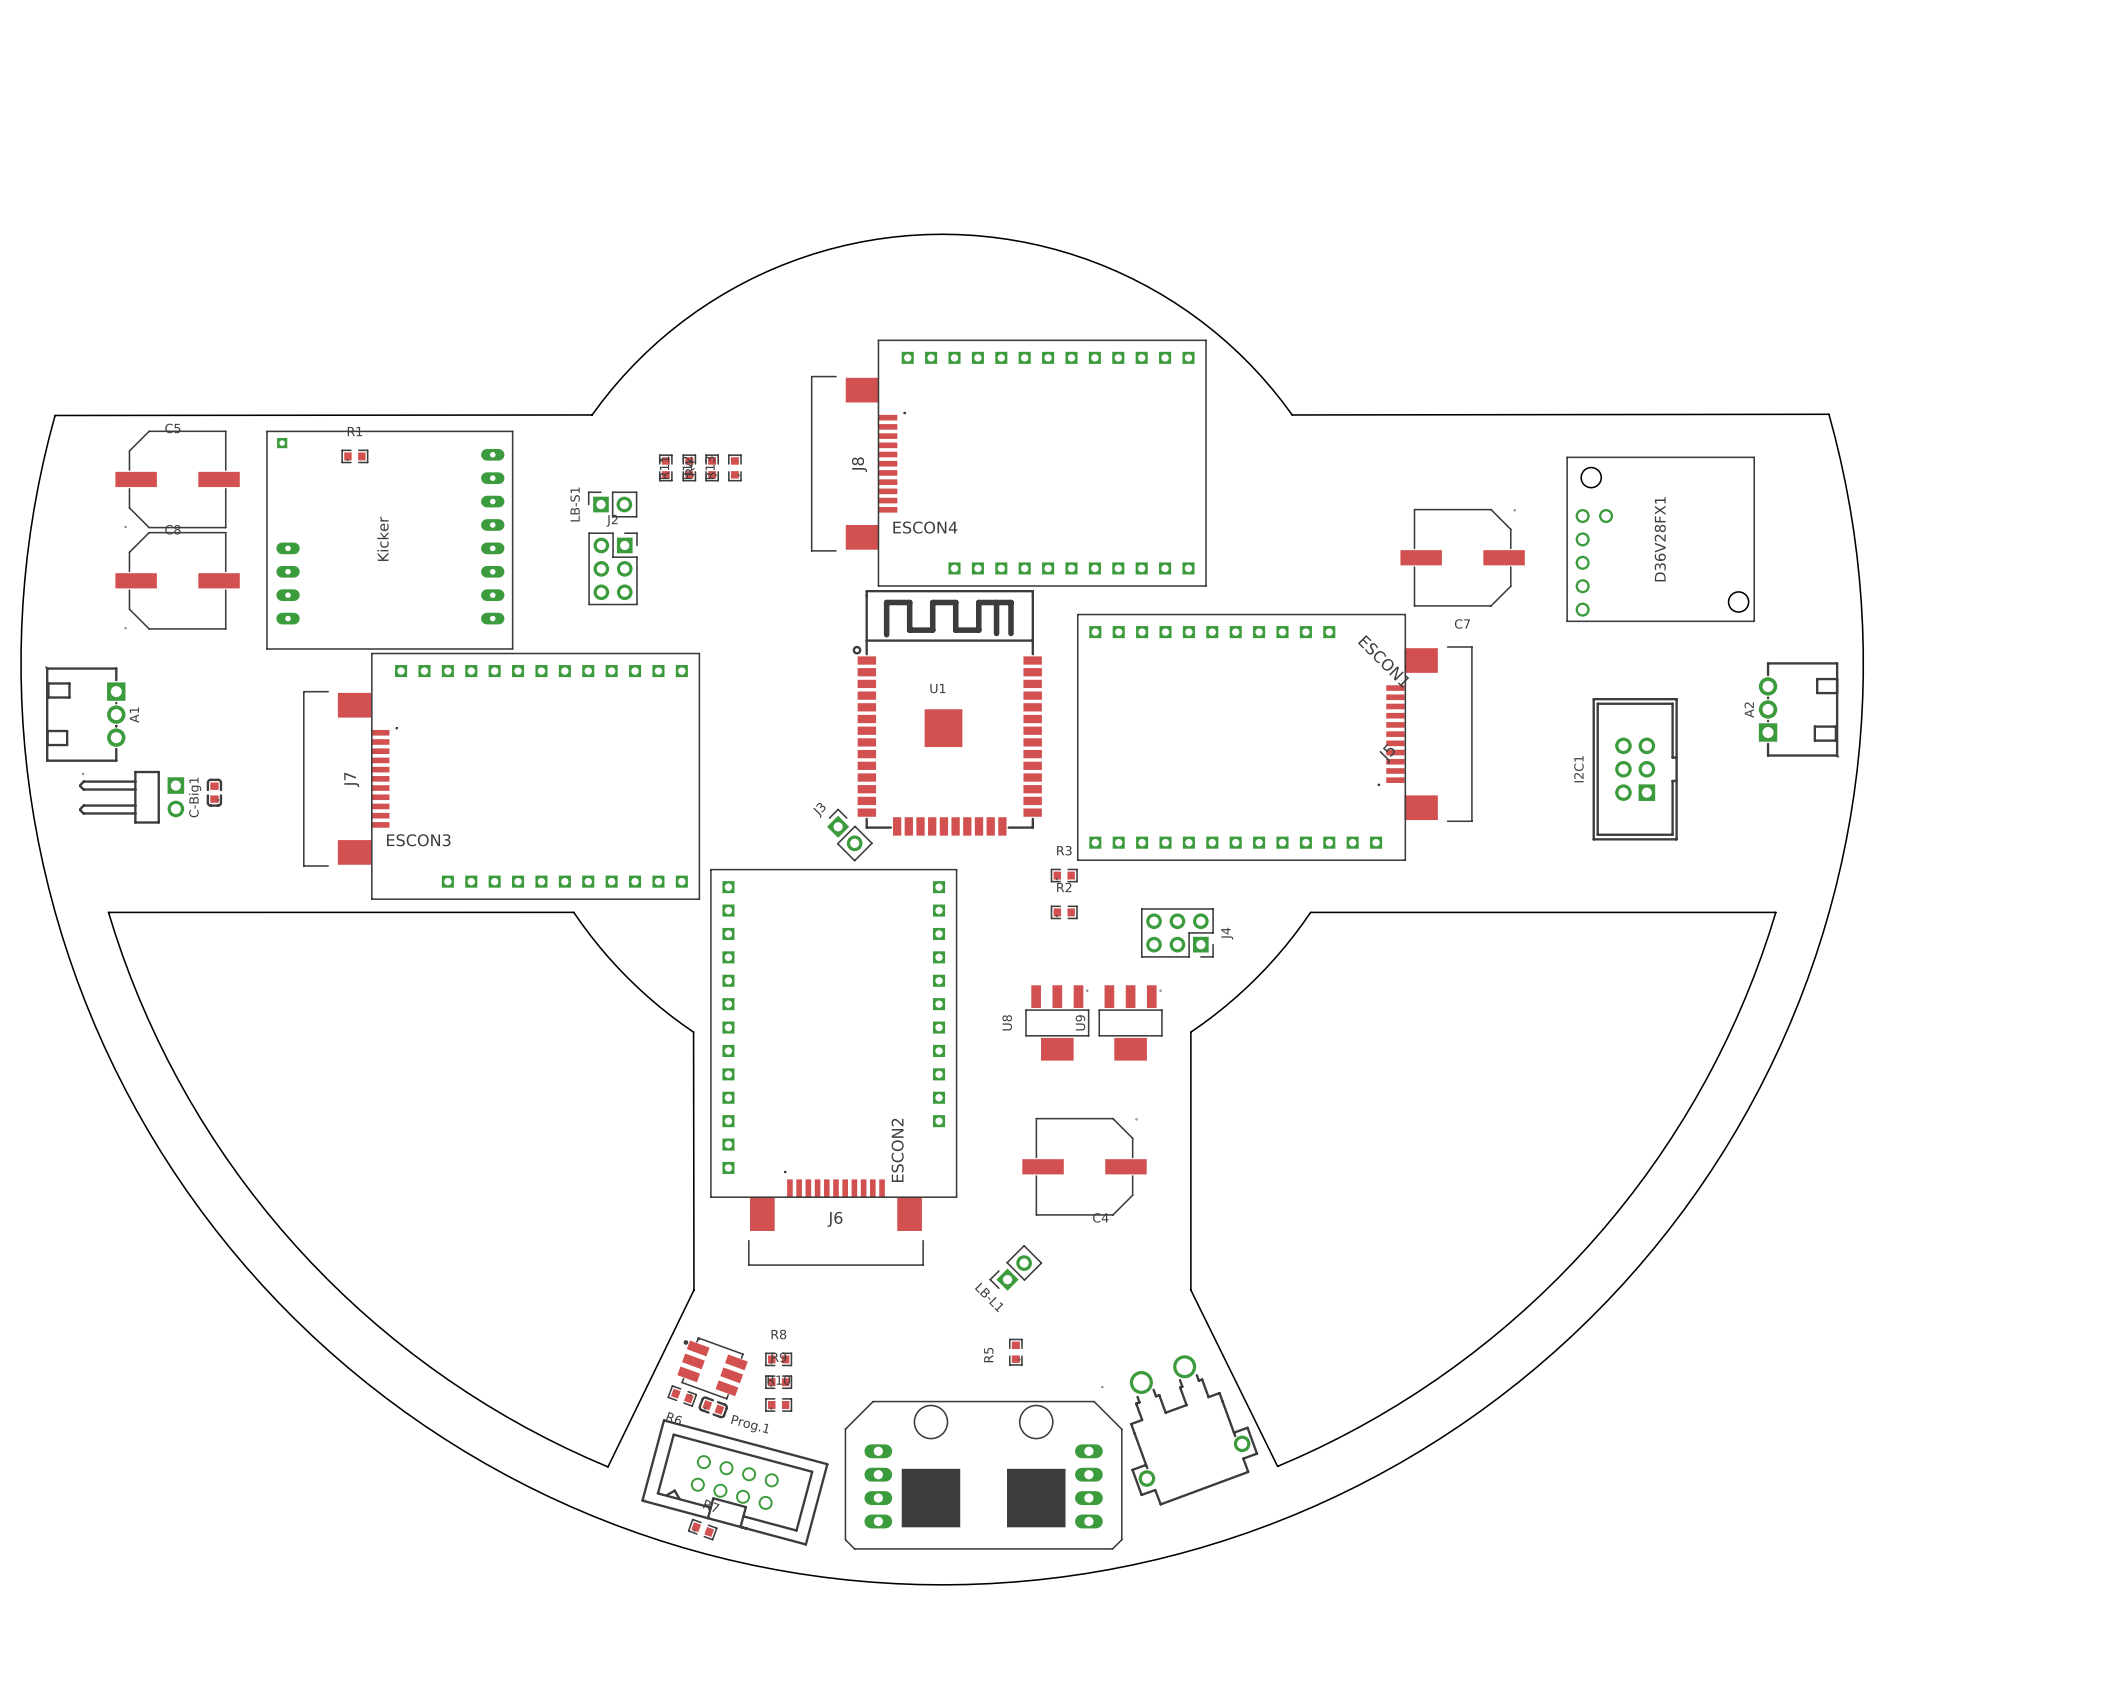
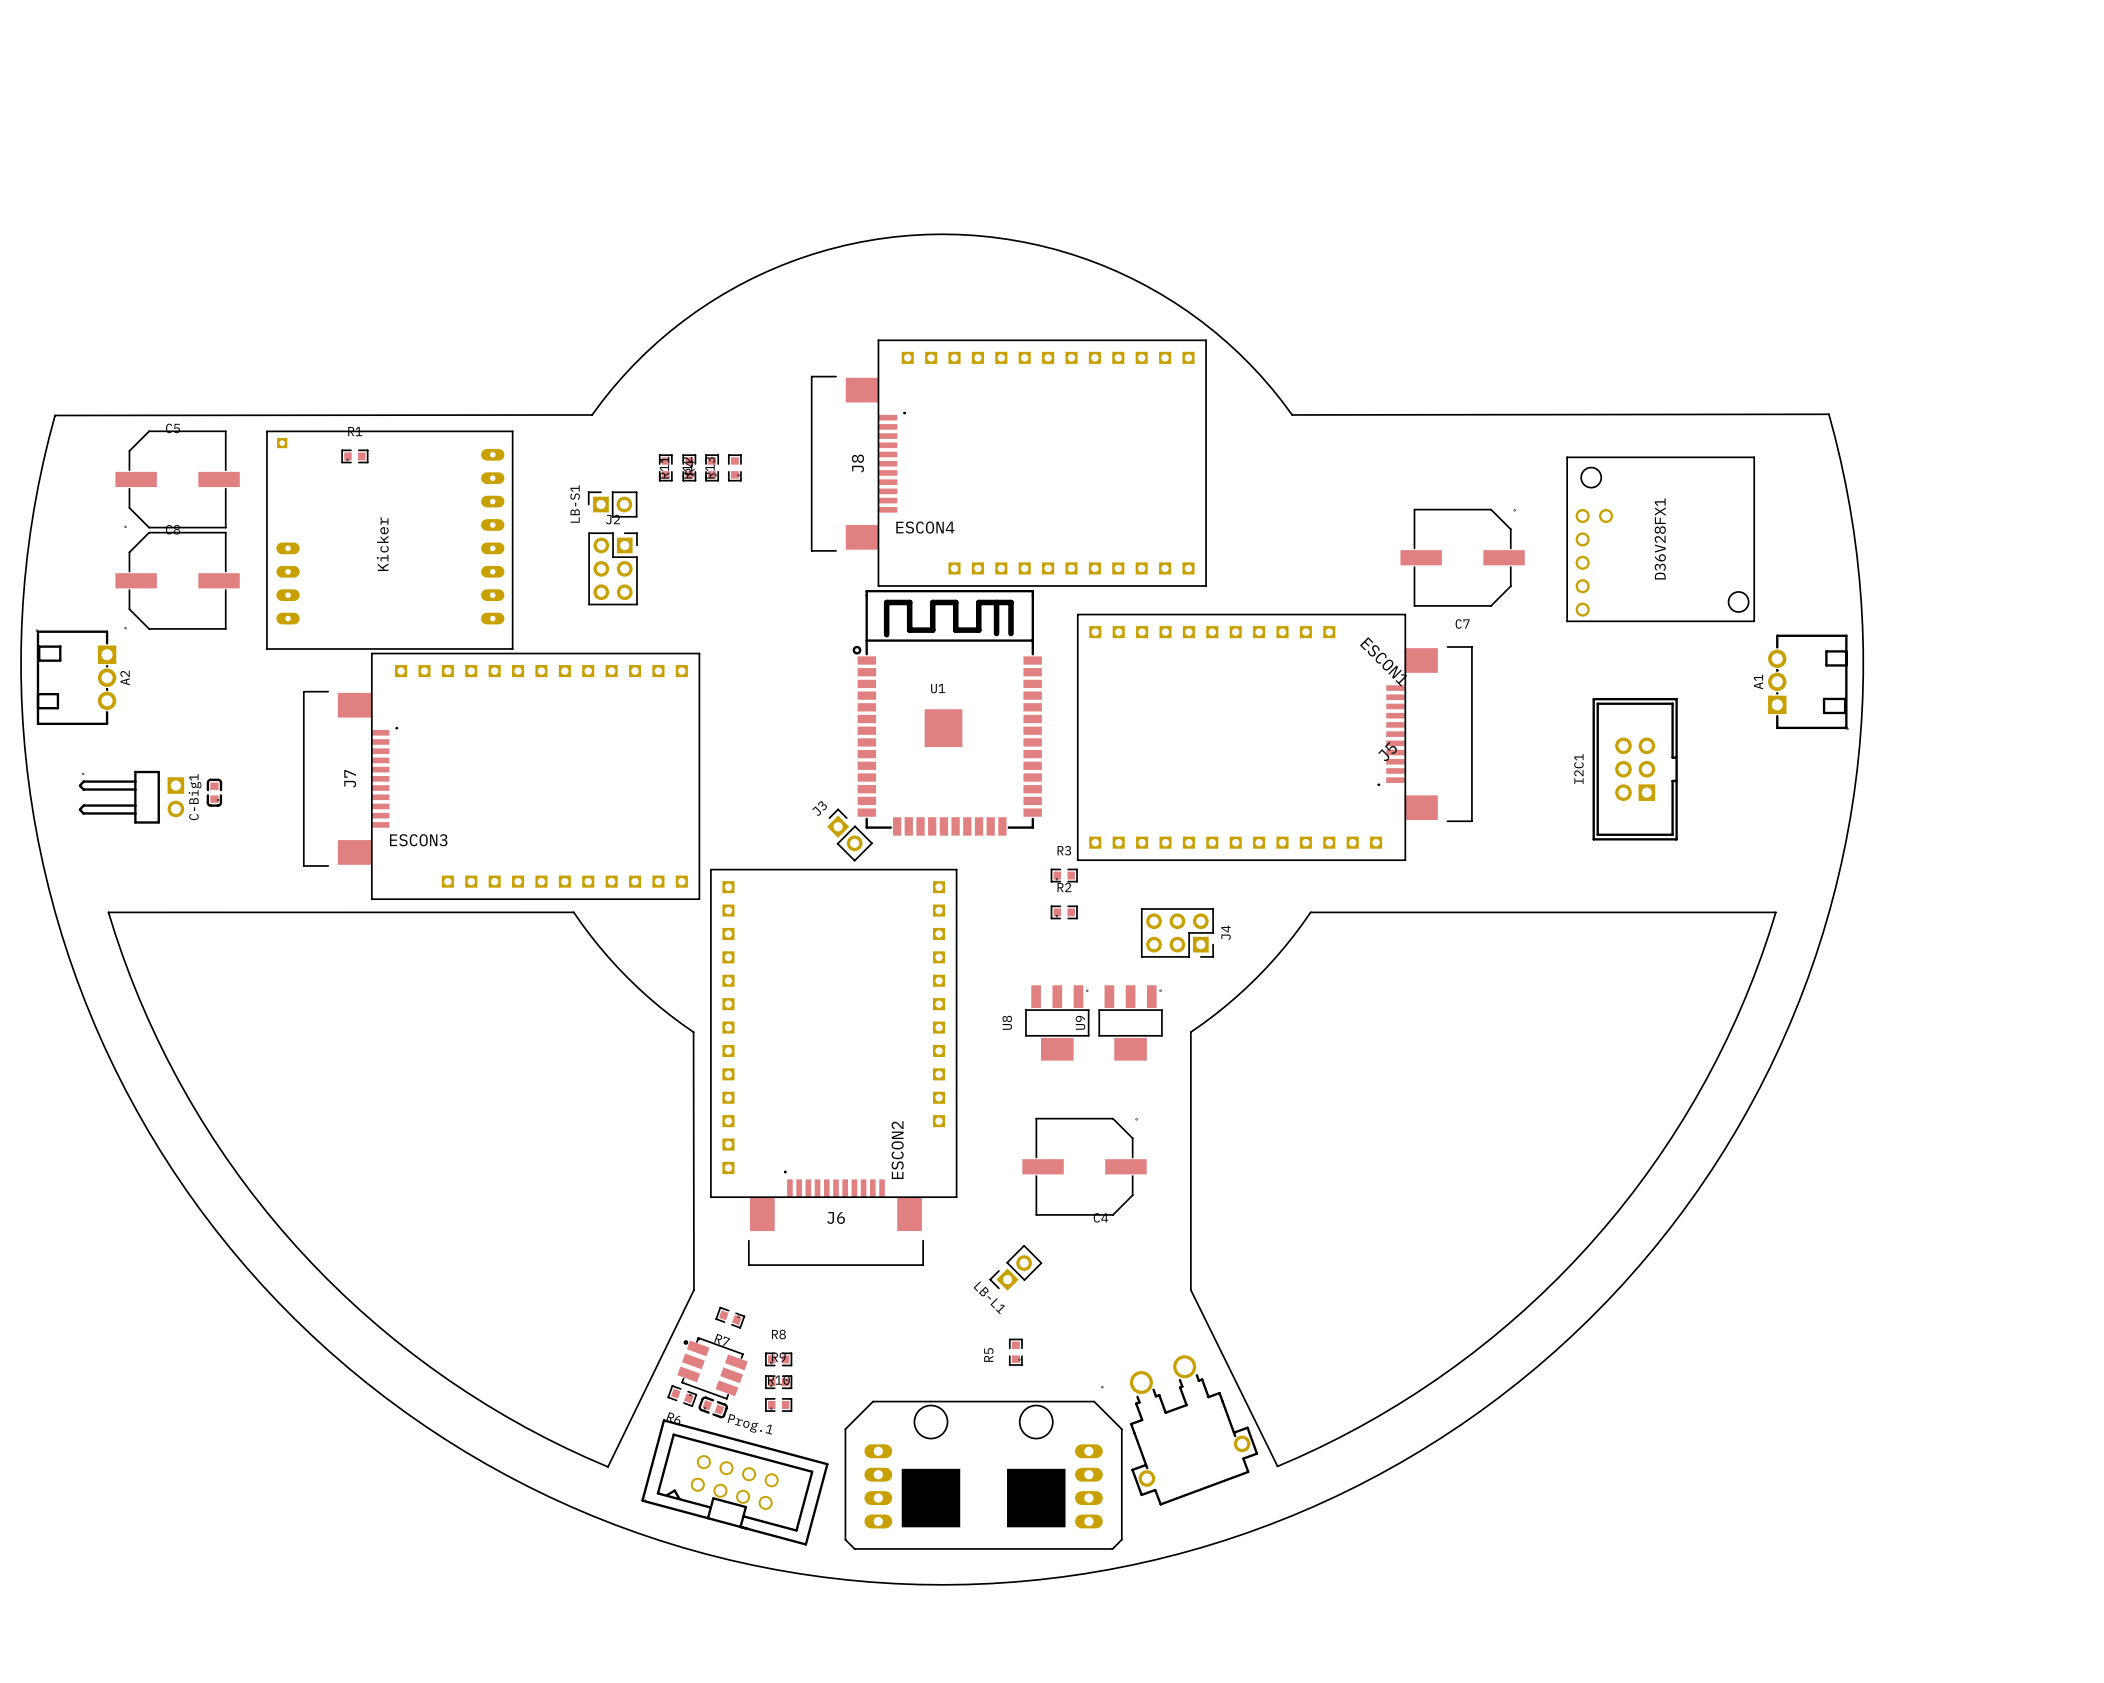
A2 rotation: 0° (1798, 709) -> 180° (76, 677)
A2 position: (1798, 709) -> (76, 677)
A1 rotation: 0° (85, 714) -> 180° (1808, 682)
A1 position: (85, 714) -> (1808, 682)
R7 rotation: 0° (702, 1529) -> 180° (730, 1317)
R7 position: (702, 1529) -> (730, 1317)

